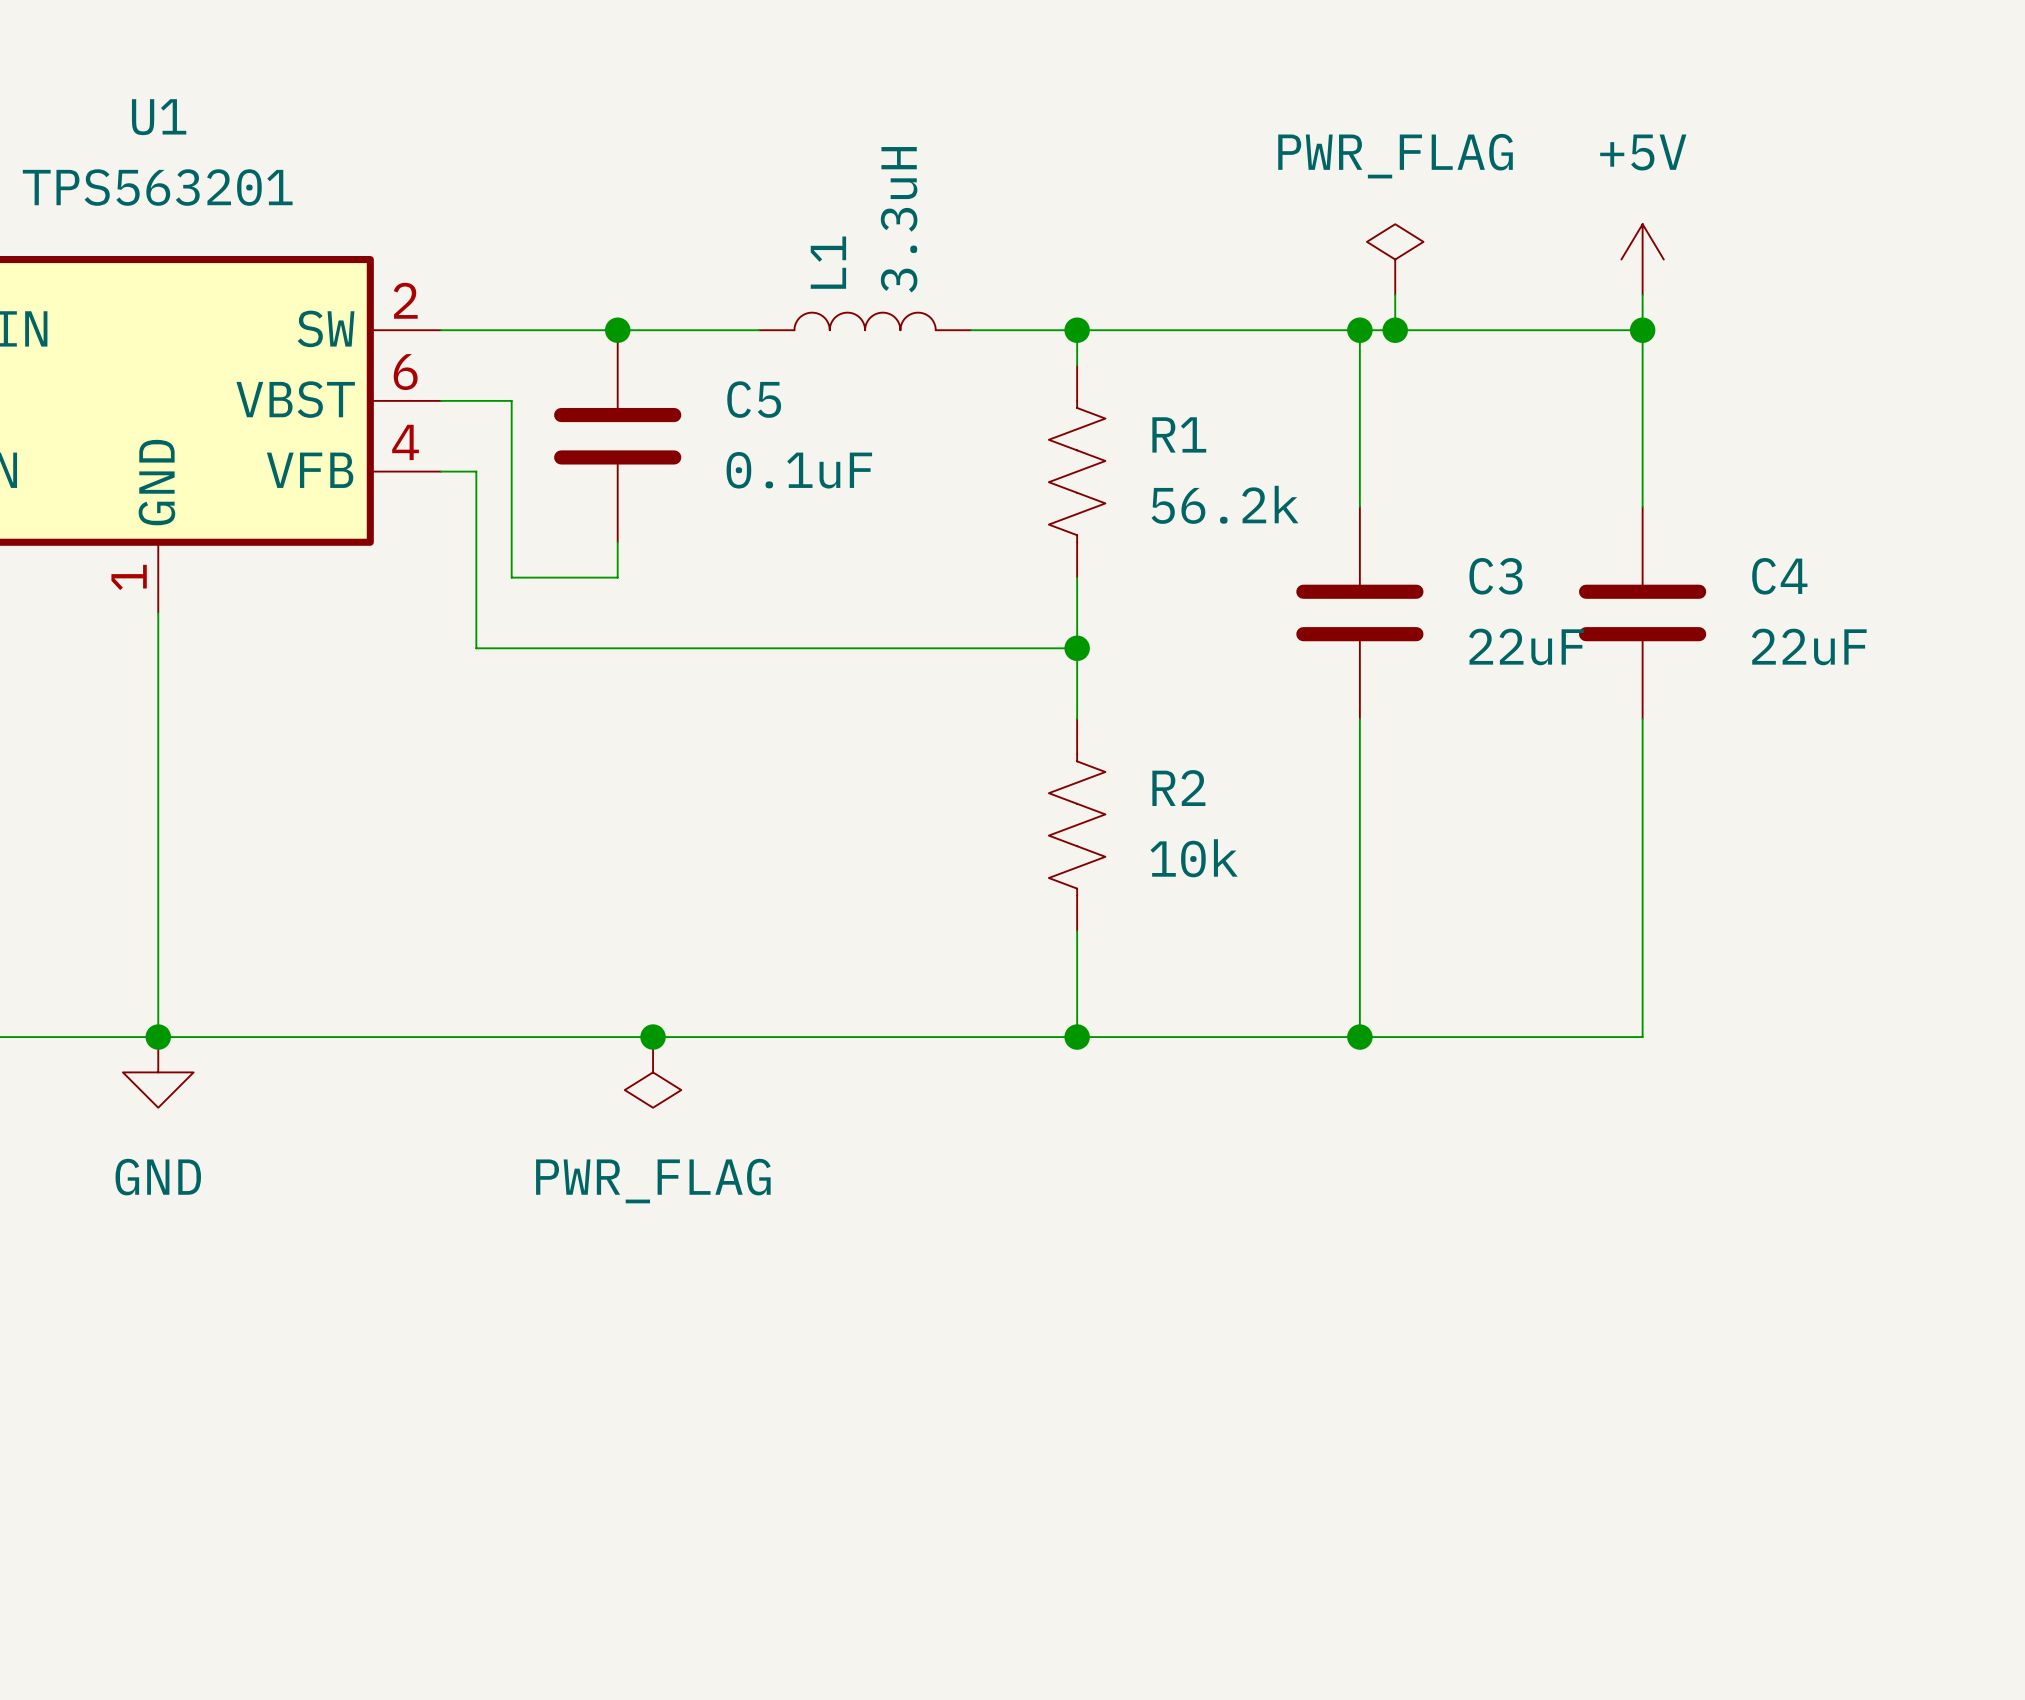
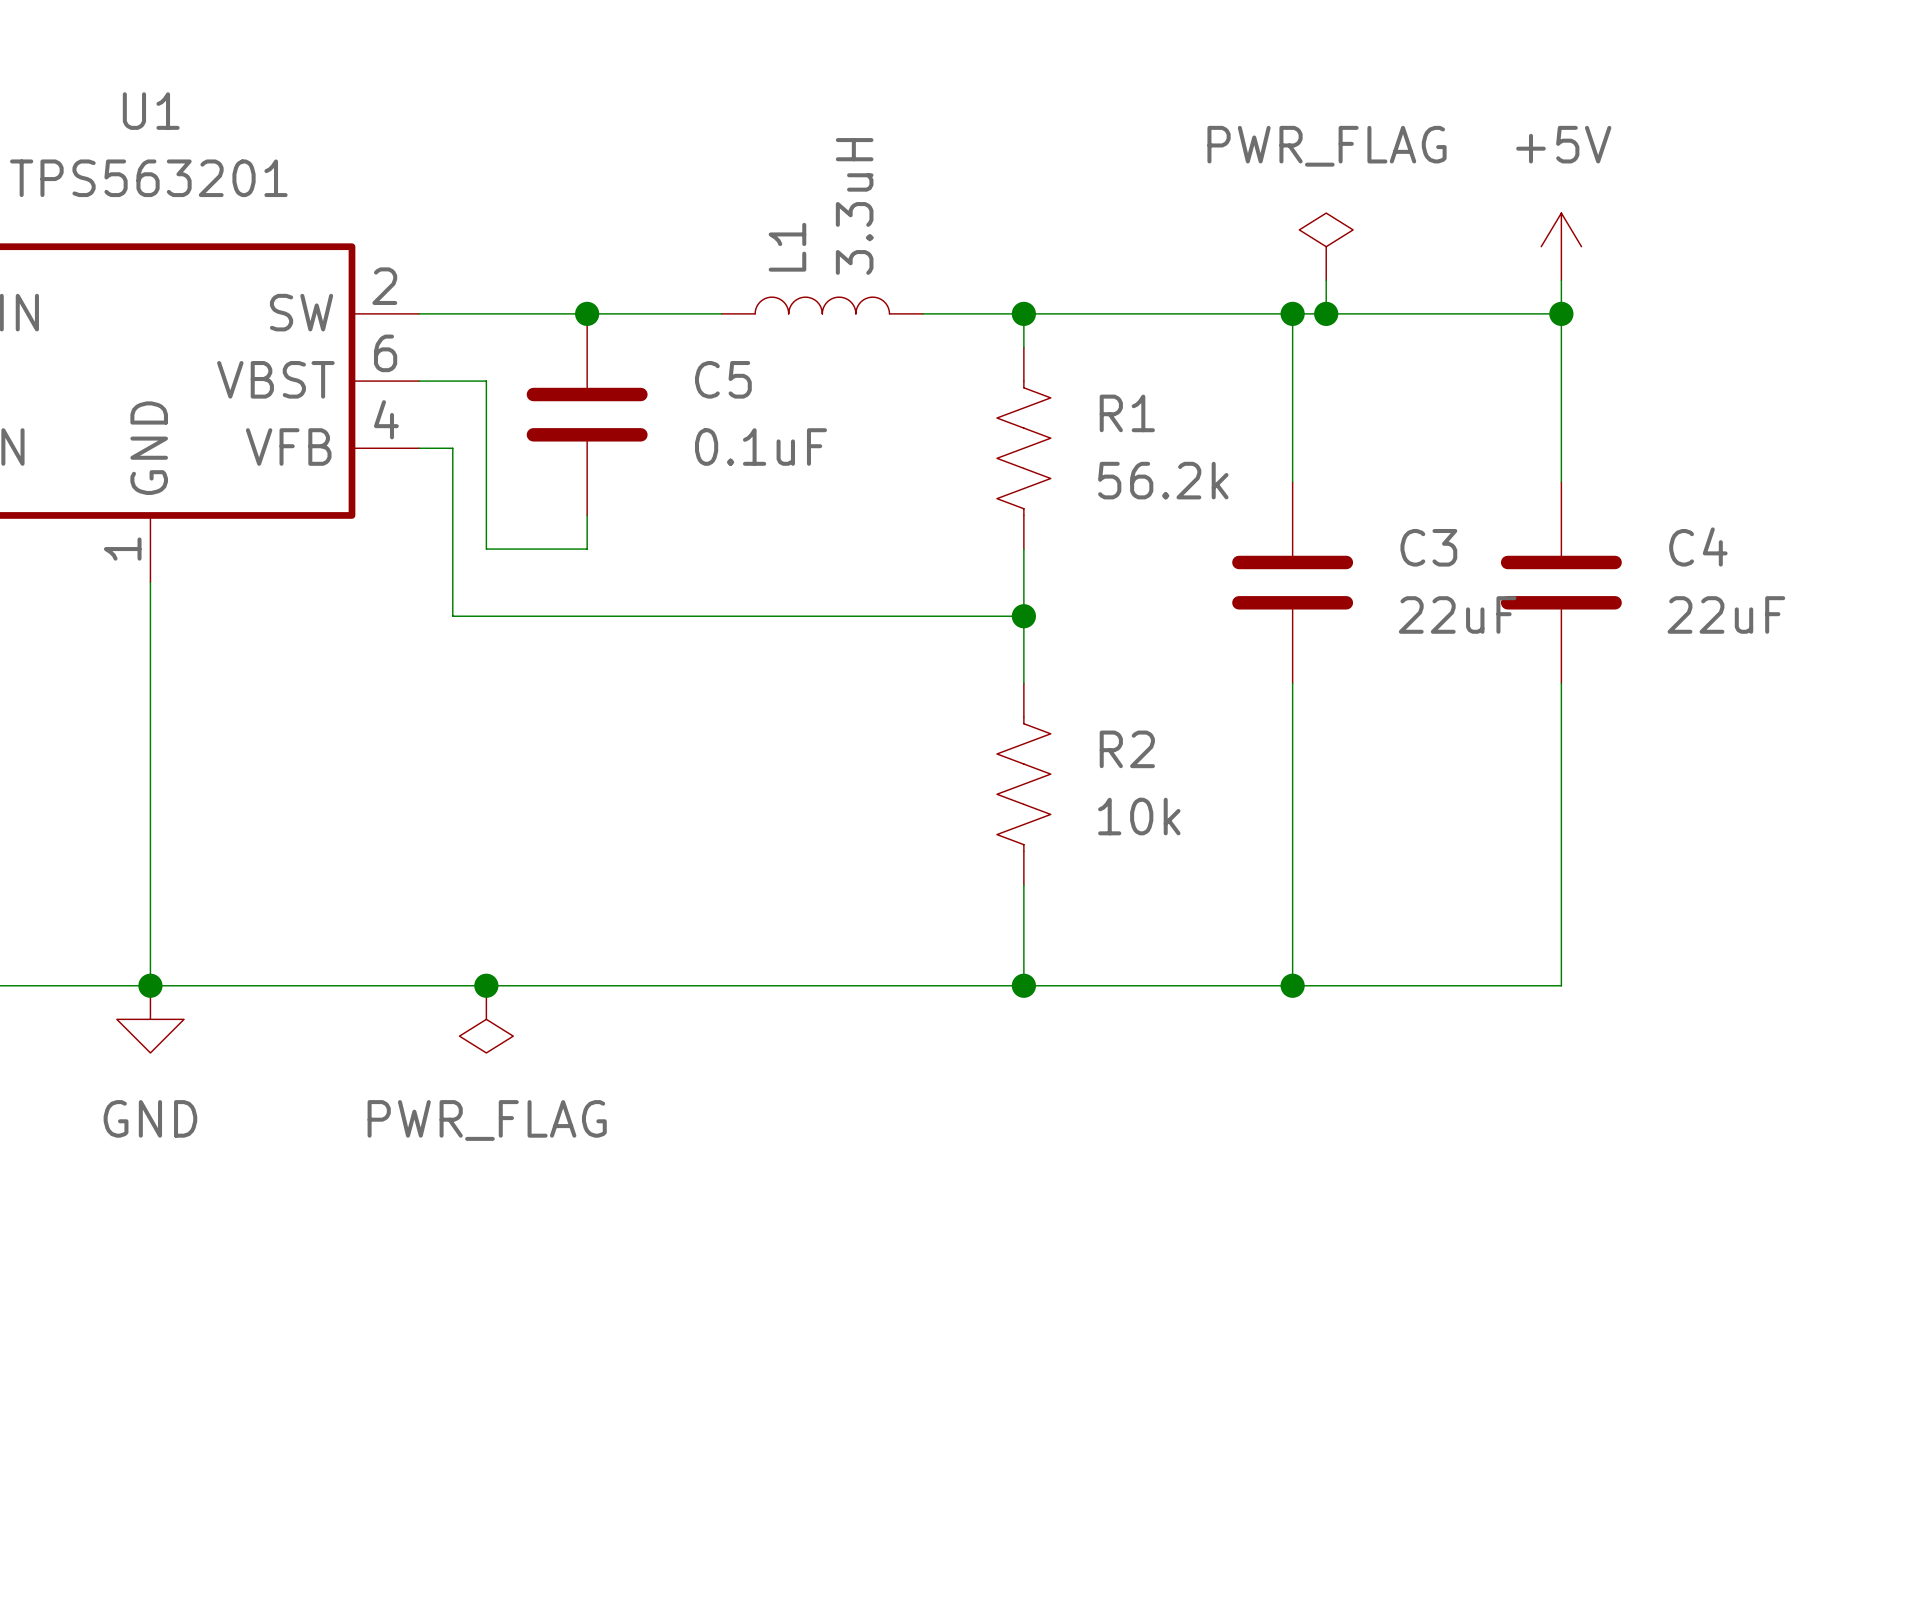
junction position: (653, 1037) -> (486, 985)
power symbol position: PWR_FLAG (653, 1072) -> PWR_FLAG (486, 1019)

